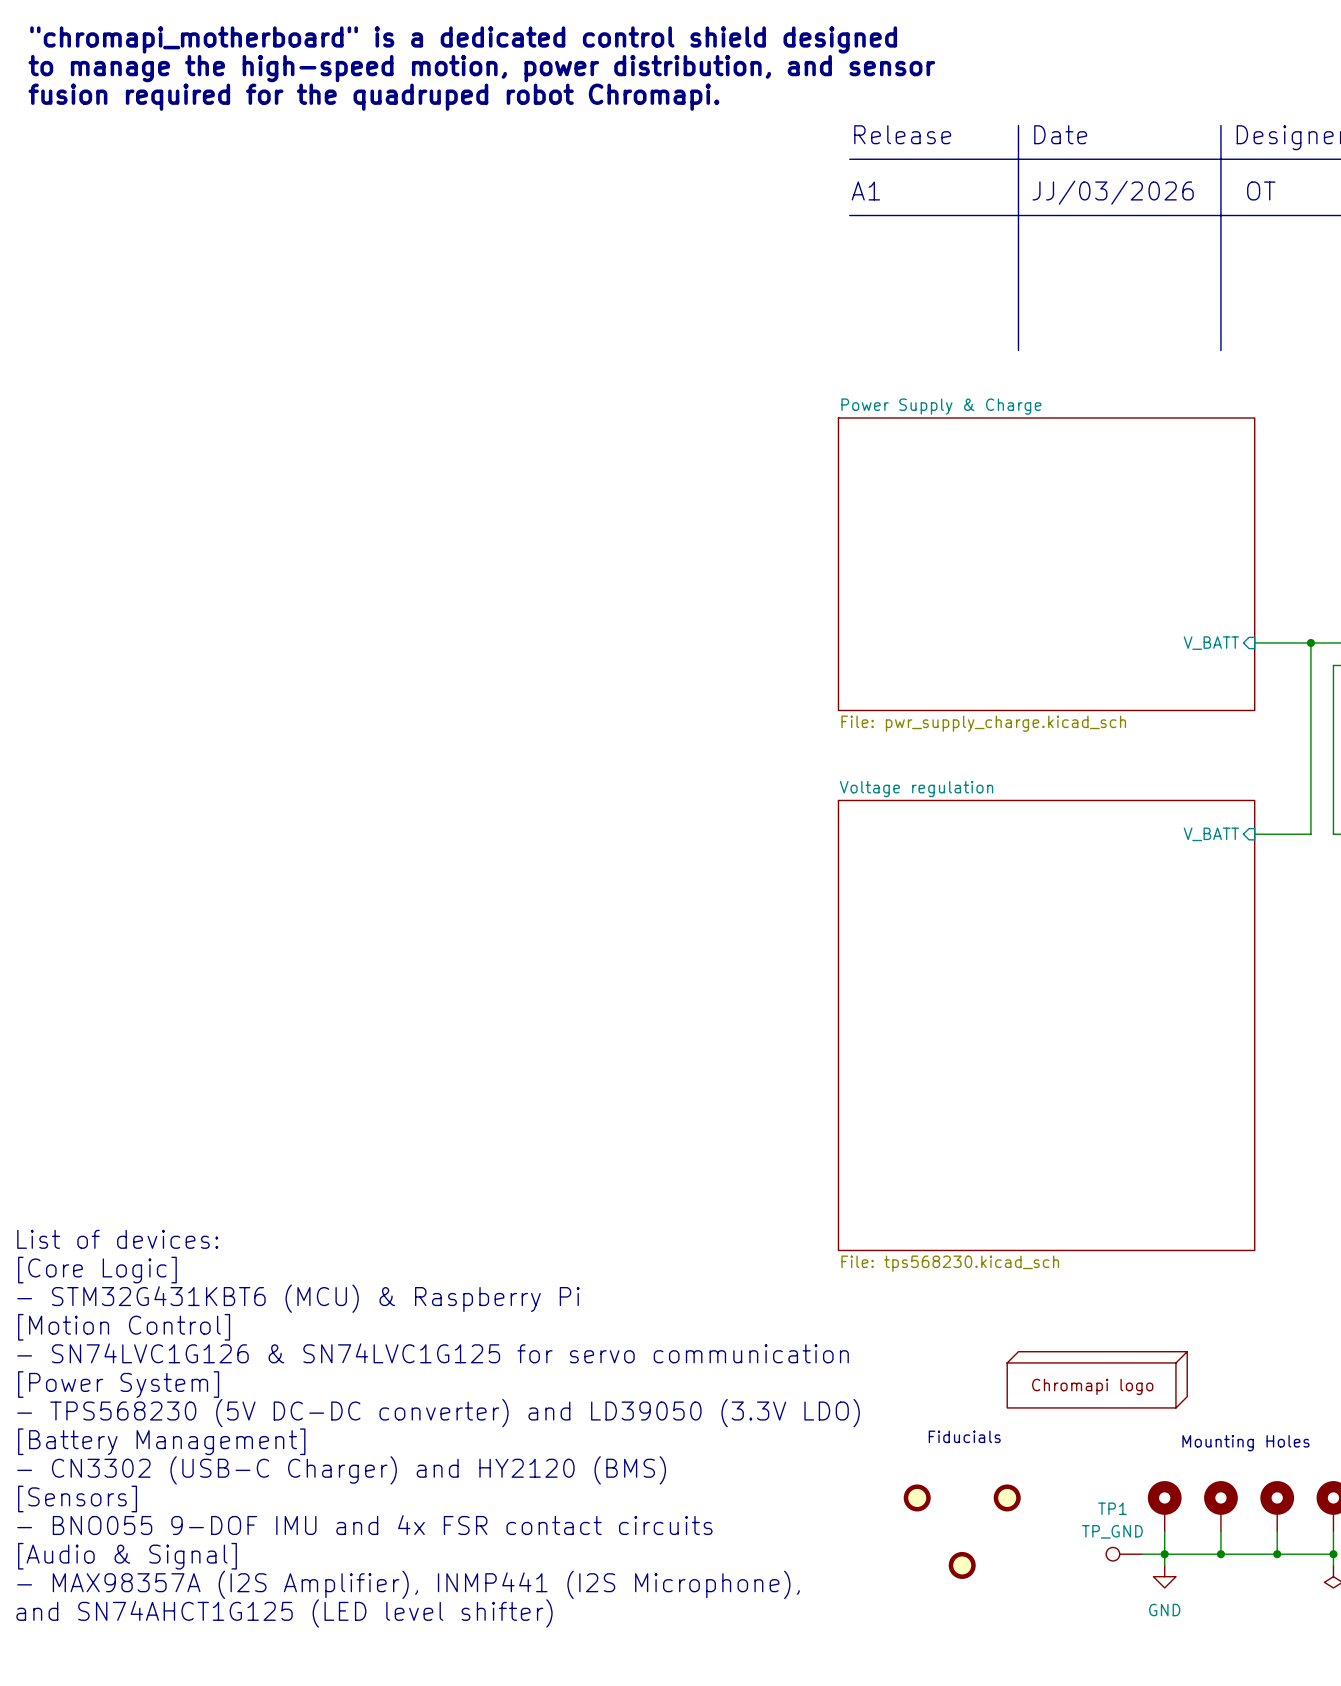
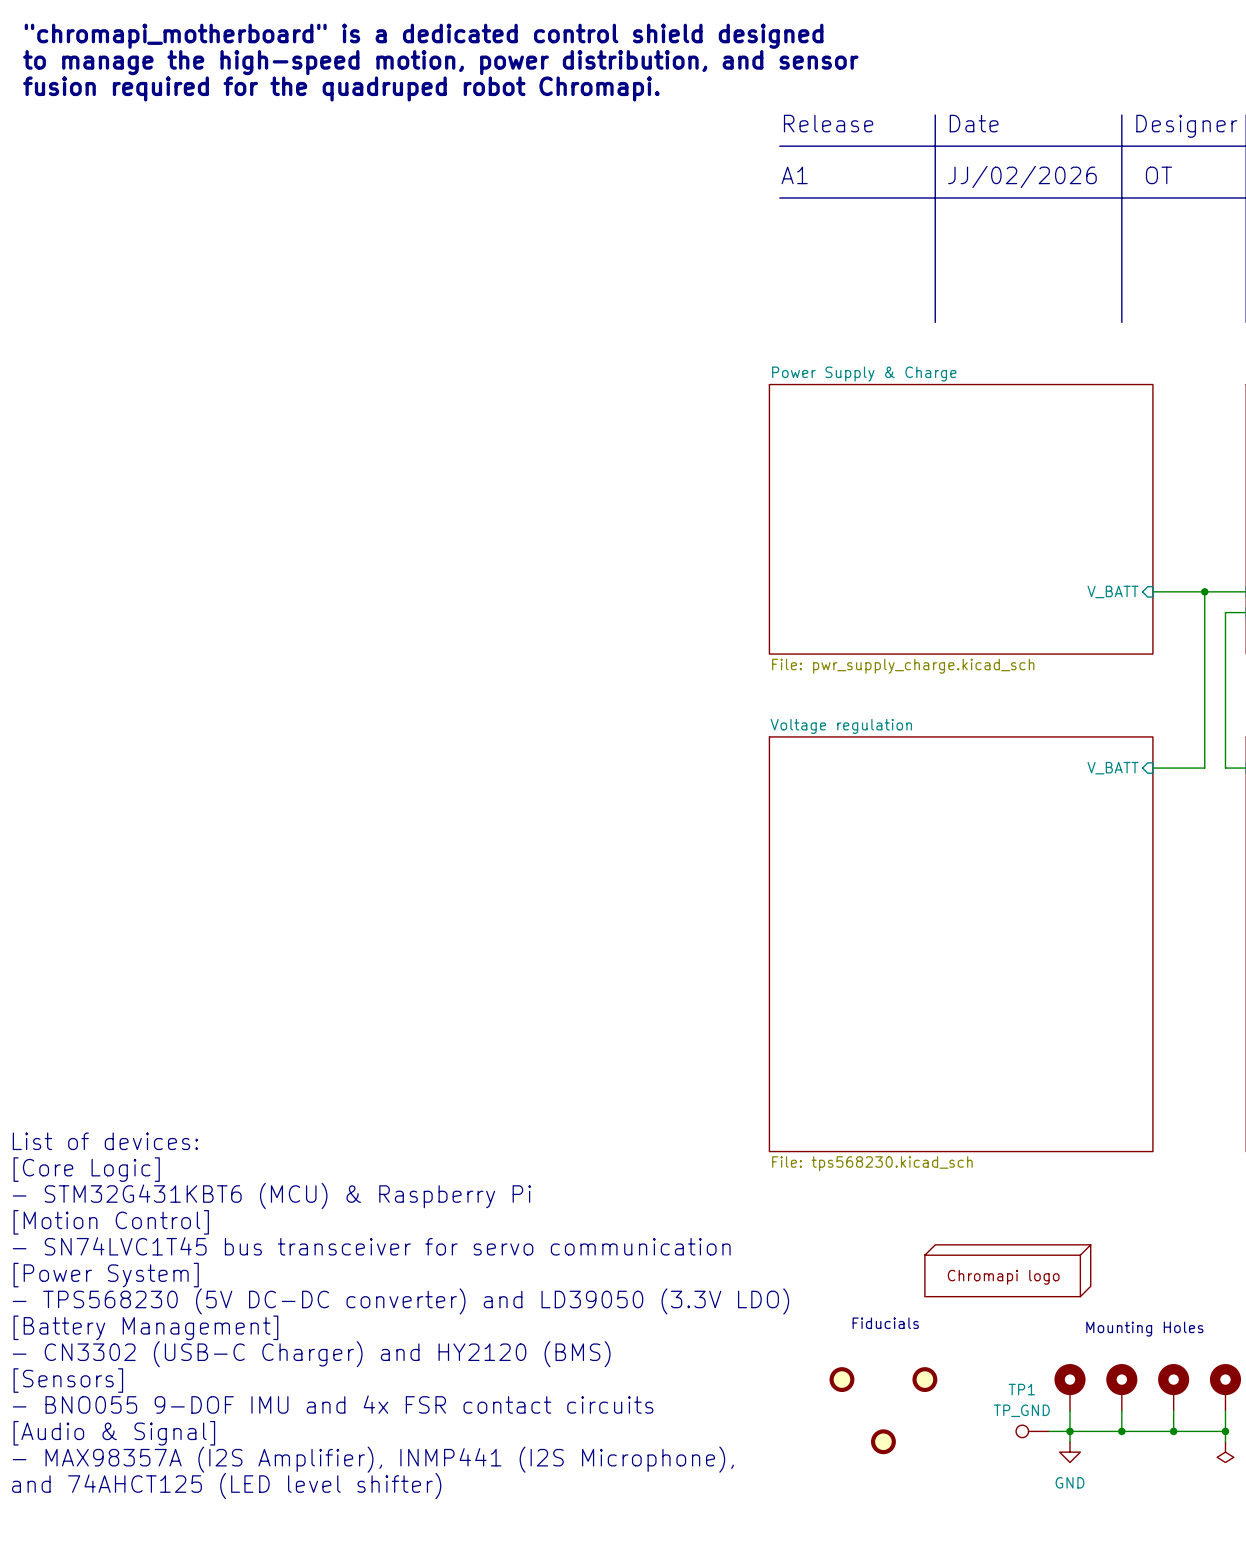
text: JJ/03/2026 (1113, 192) -> JJ/02/2026 (1022, 176)
text: - SN74LVC1G126 & SN74LVC1G125 for servo communication (433, 1353) -> - SN74LVC1T45 bus transceiver for servo communication (371, 1246)
text: and SN74AHCT1G125 (LED level shifter) (284, 1613) -> and 74AHCT125 (LED level shifter) (226, 1485)

